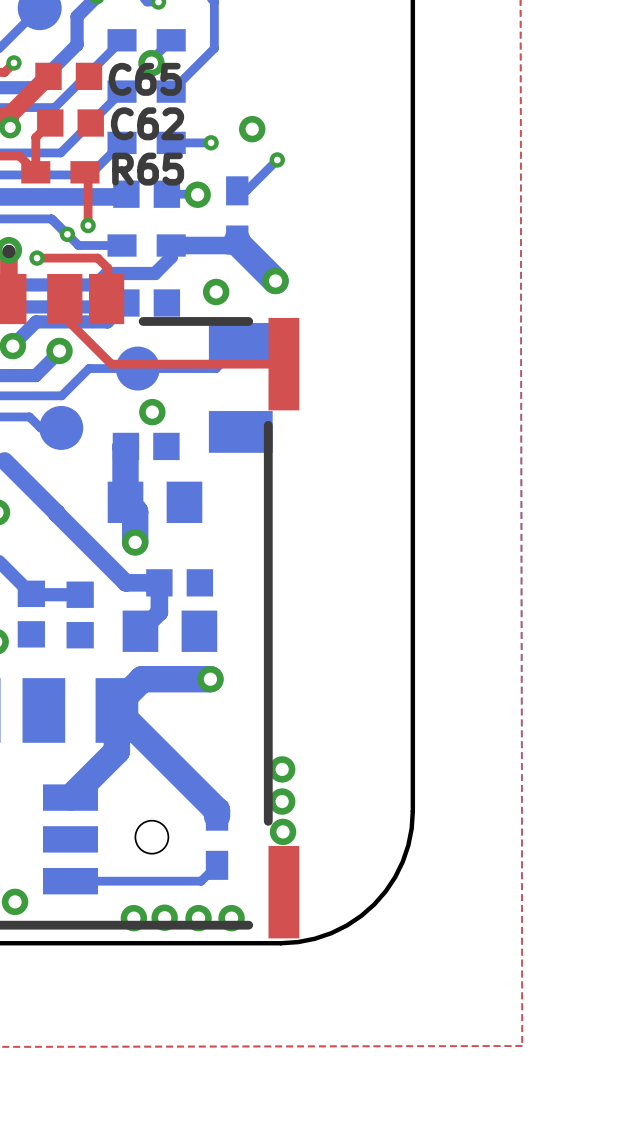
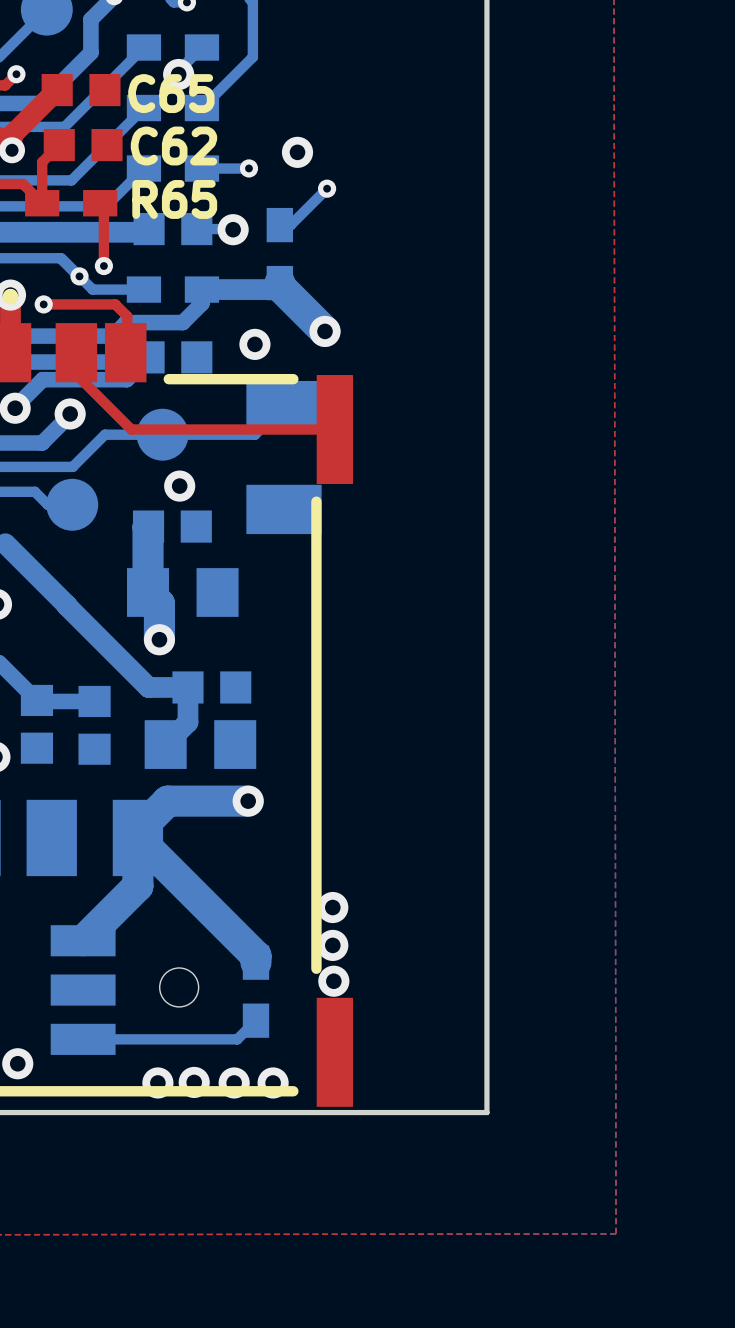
board edge: (412, 811) (411, 828) (402, 861) (385, 891) (374, 904) (346, 925) (331, 933) (314, 938) (280, 943) -> (486, 956) (486, 1112) (331, 1112)

